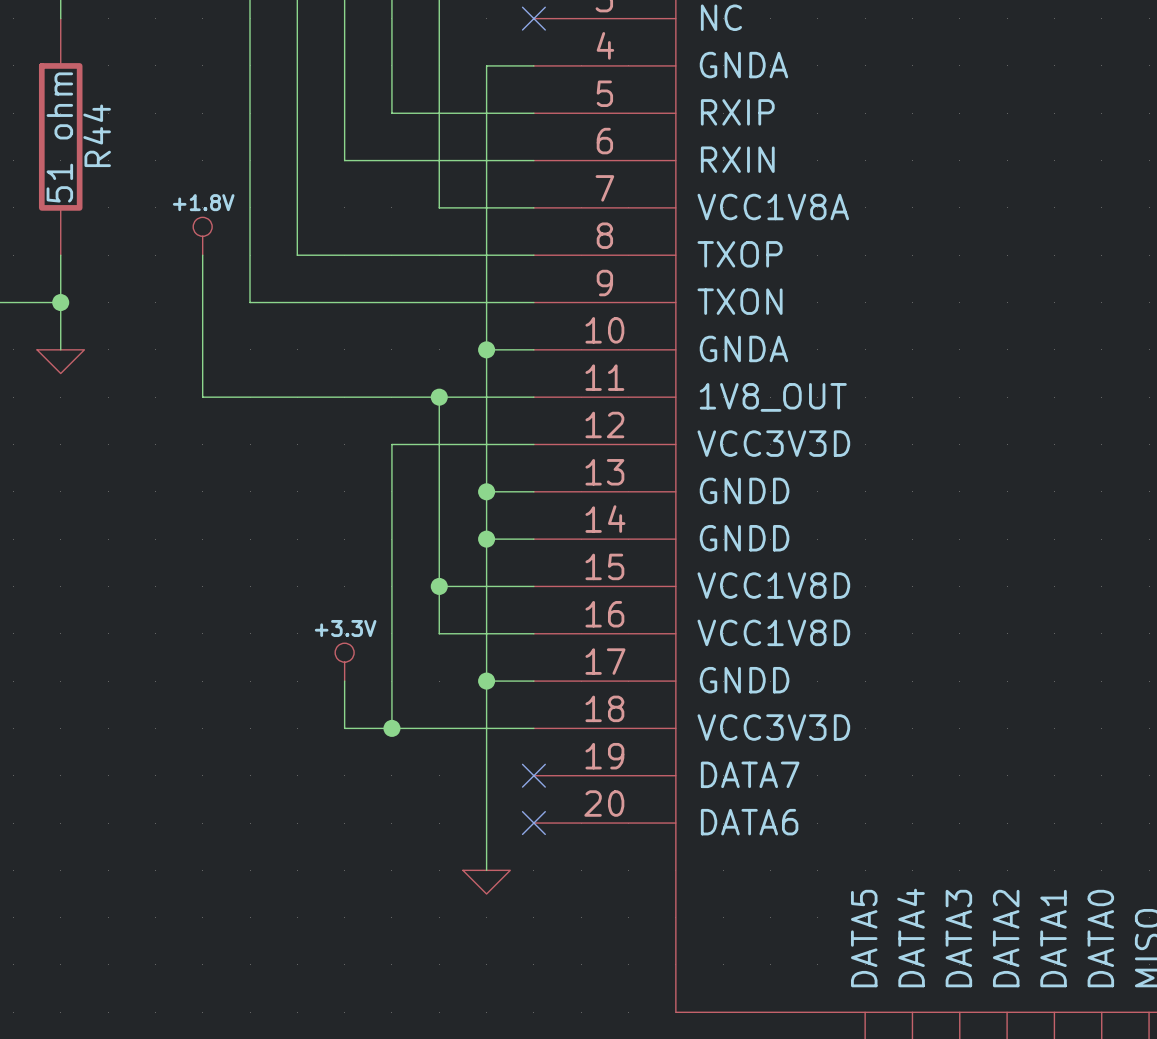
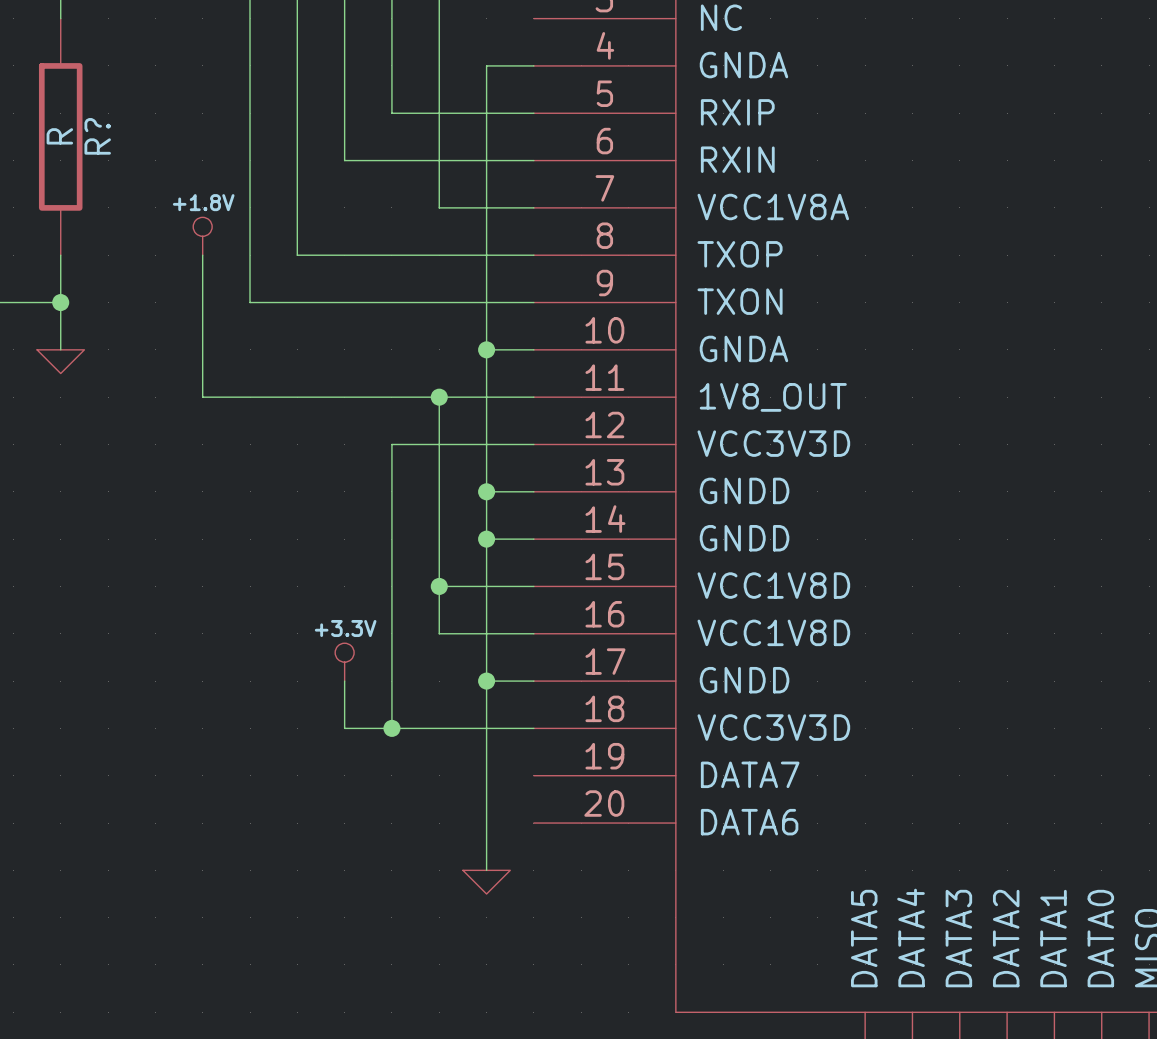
no-connect mark: (533, 18) -> none
R44 name: R44 (97, 135) -> R? (97, 136)
R44 value: 51 ohm (59, 137) -> R (59, 136)
no-connect mark: (533, 775) -> none
no-connect mark: (533, 823) -> none

